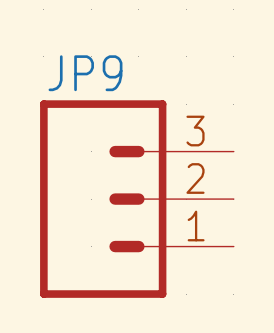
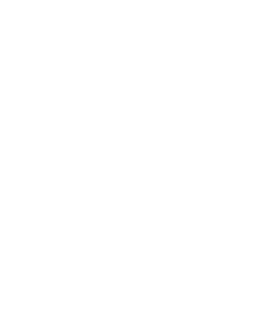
JP9: (136, 199) -> none

